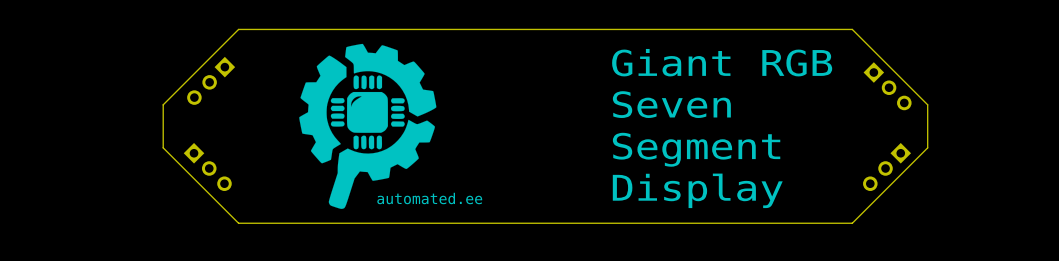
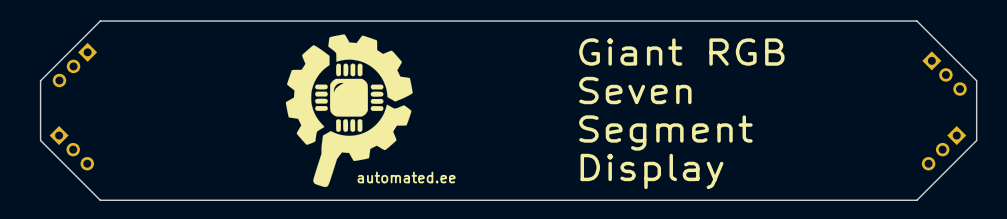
board edge: (238, 29) (163, 104) (163, 147) (238, 223) -> (229, 21) (100, 21) (40, 80) (40, 140) (100, 200) (229, 200)
board edge: (852, 29) (927, 104) (927, 147) (852, 223) -> (797, 21) (916, 21) (976, 80) (976, 140) (916, 200) (797, 200)
part: none -> (74, 65)
part: (211, 80) -> none
part: (887, 86) -> none
part: none -> (944, 73)
part: none -> (71, 148)
part: (207, 166) -> none
part: (887, 166) -> none
part: none -> (944, 148)

